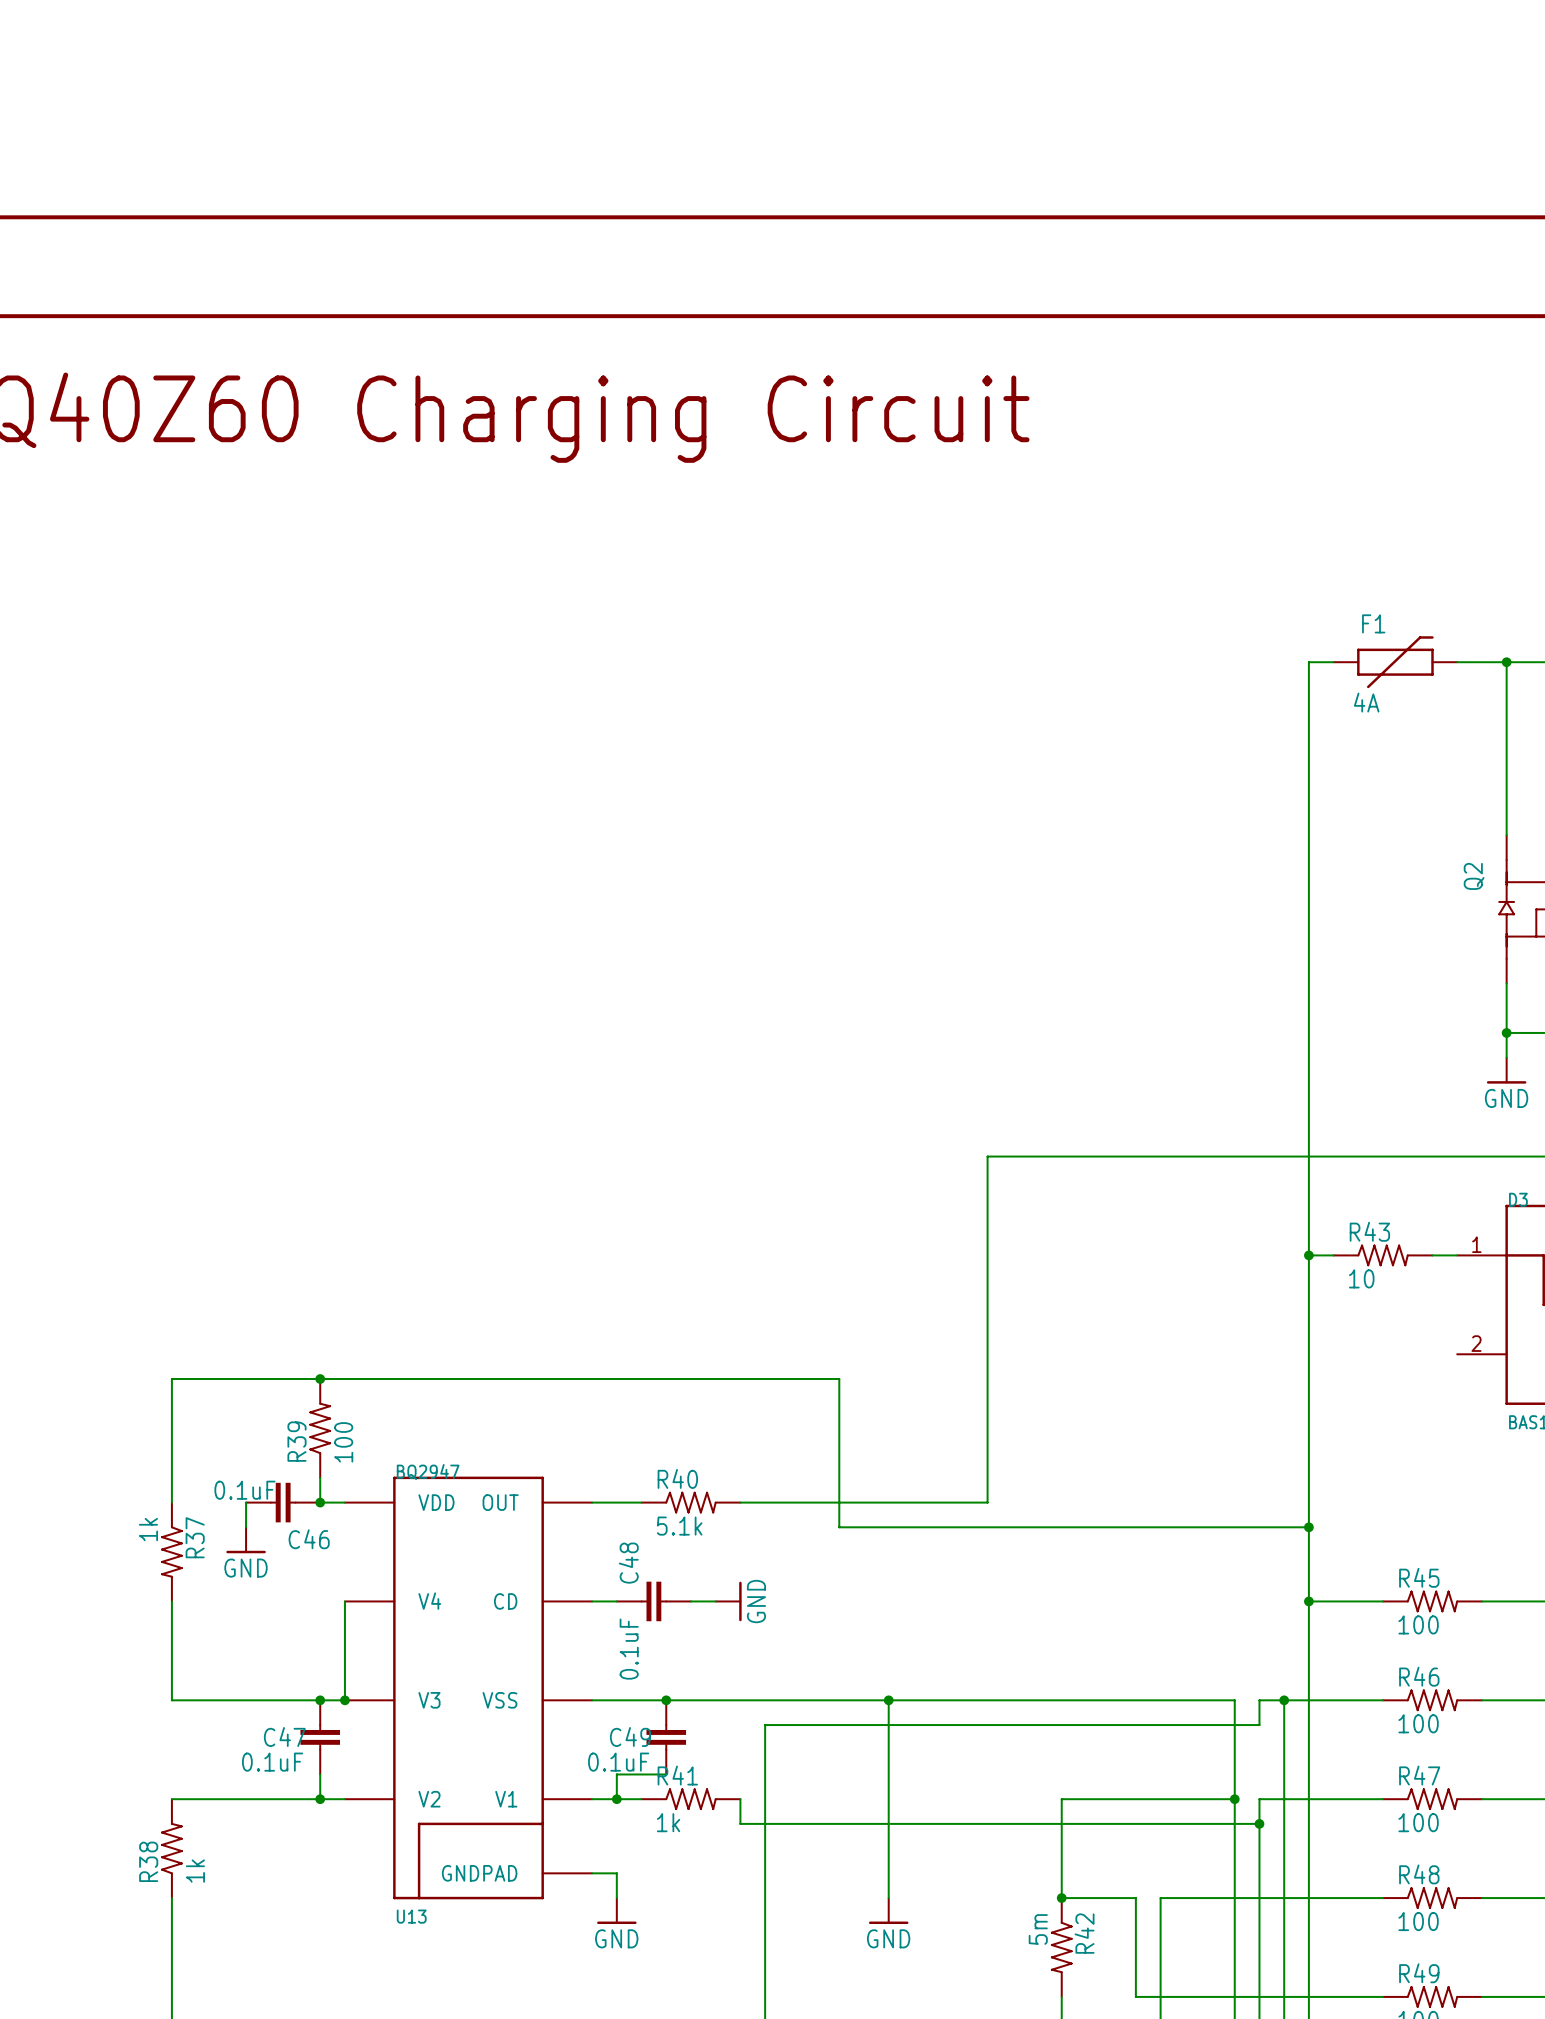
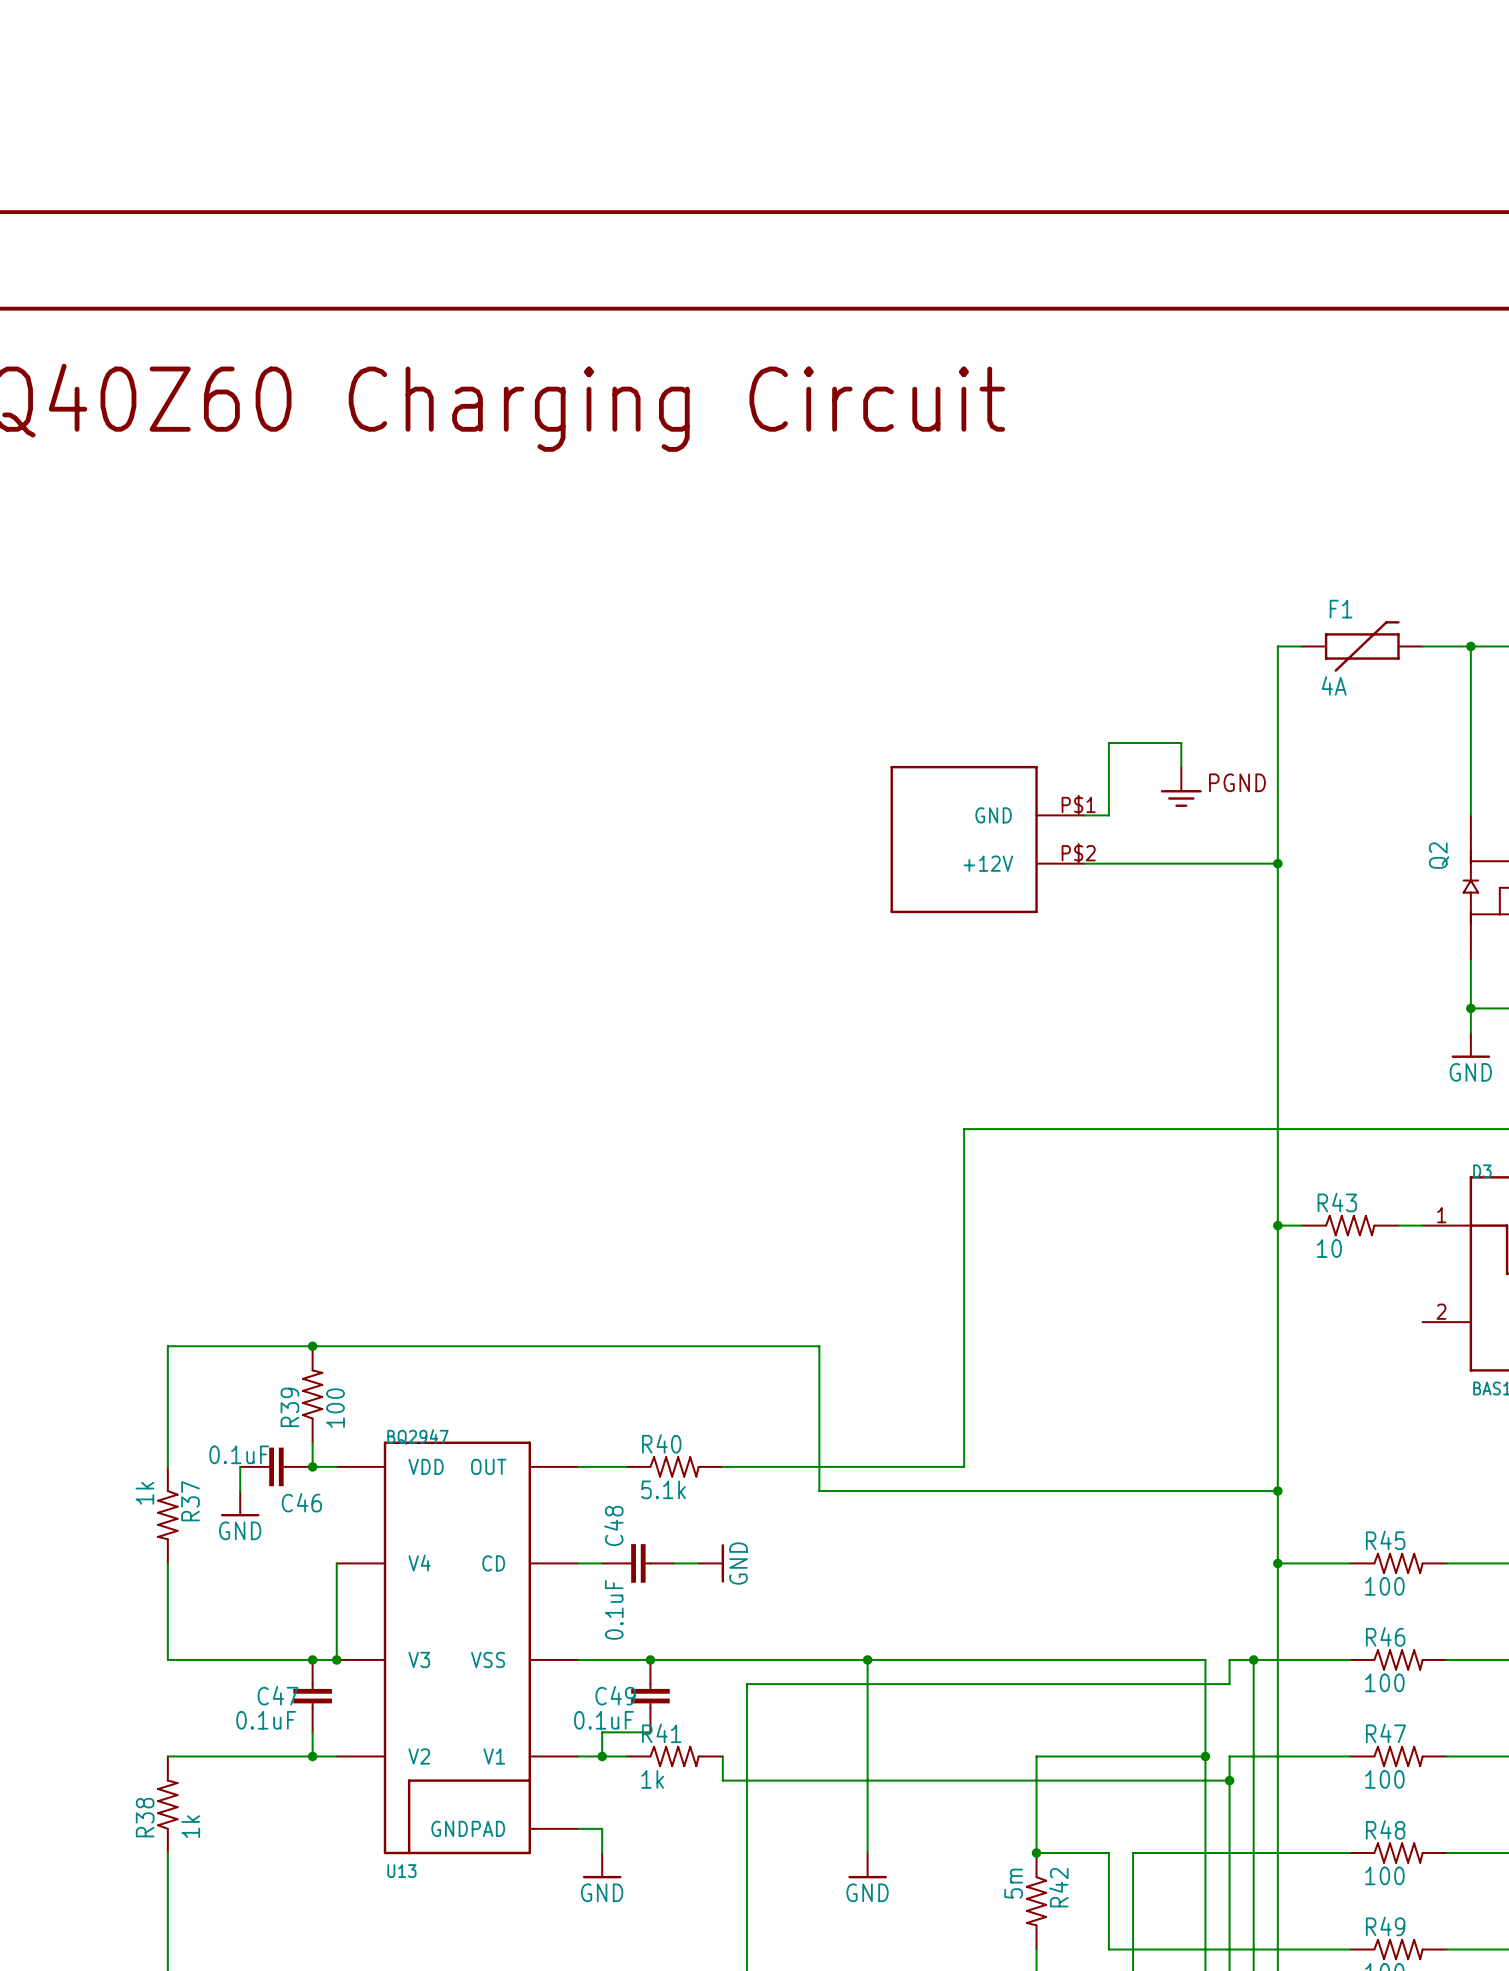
wire: none -> (1181, 767) (1181, 743) (1108, 743) (1108, 815) (1084, 815)
power symbol: none -> PGND (1181, 787)
part: none -> (987, 839)
wire: none -> (1084, 863) (1277, 863)
junction: none -> (1277, 863)

